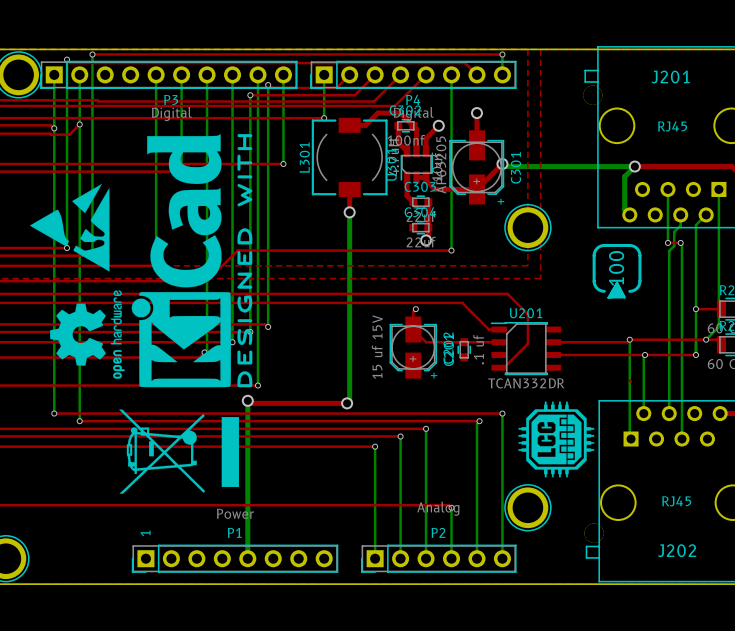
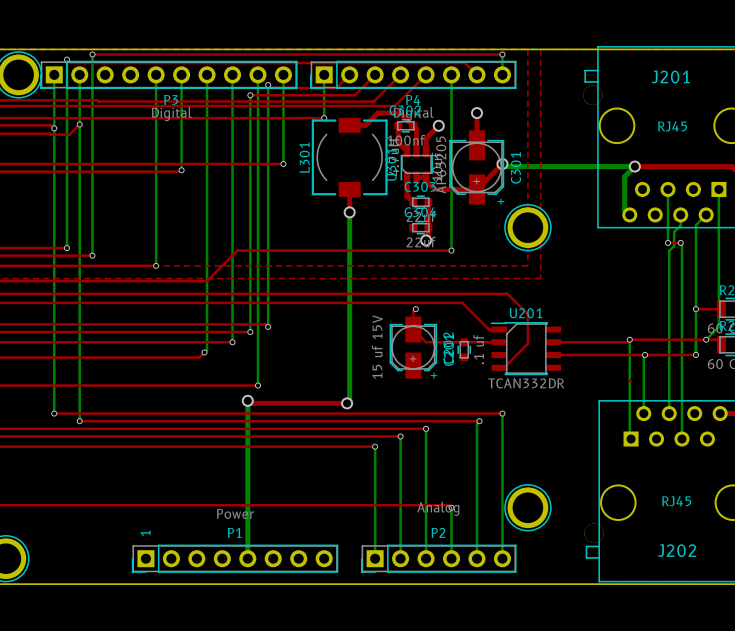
drawing: [50, 134, 253, 388] -> none
drawing: [29, 183, 110, 272] -> none
drawing: [592, 243, 642, 299] -> none
drawing: [518, 401, 595, 478] -> none
drawing: [118, 409, 240, 494] -> none

